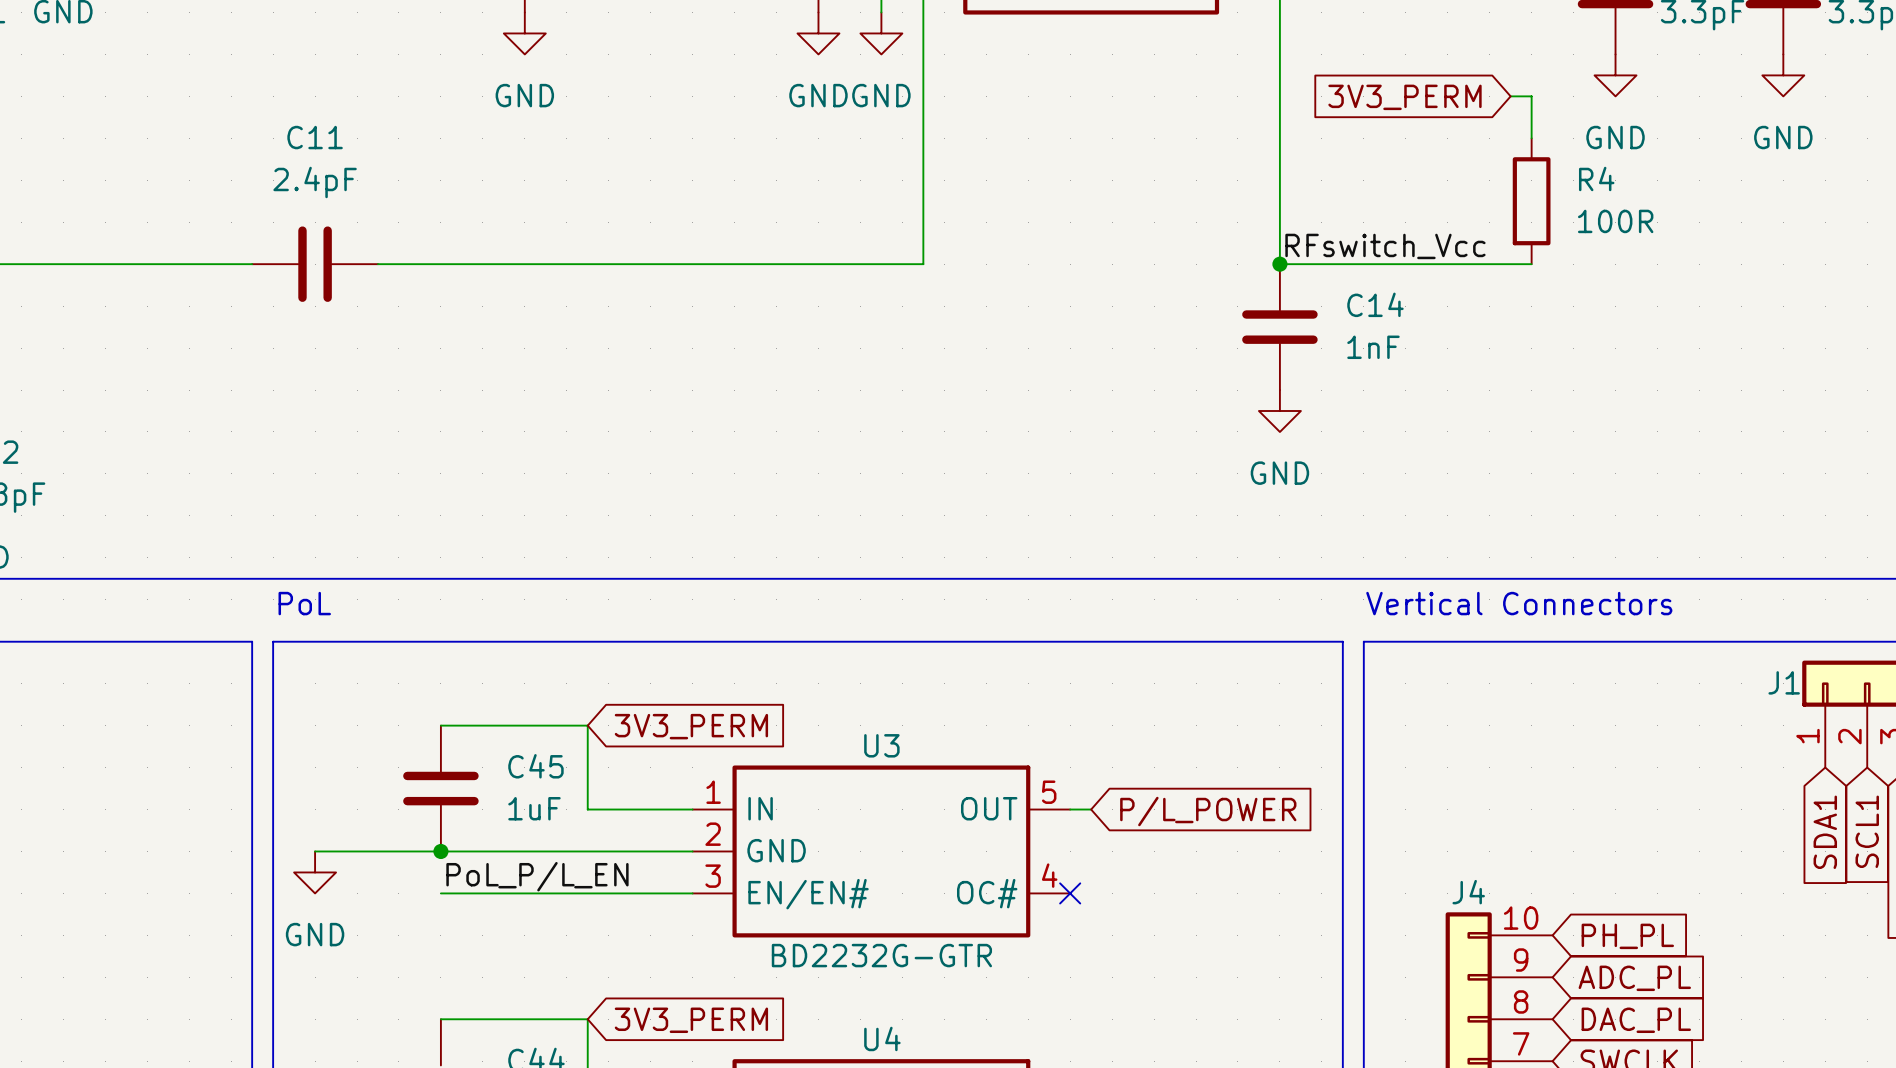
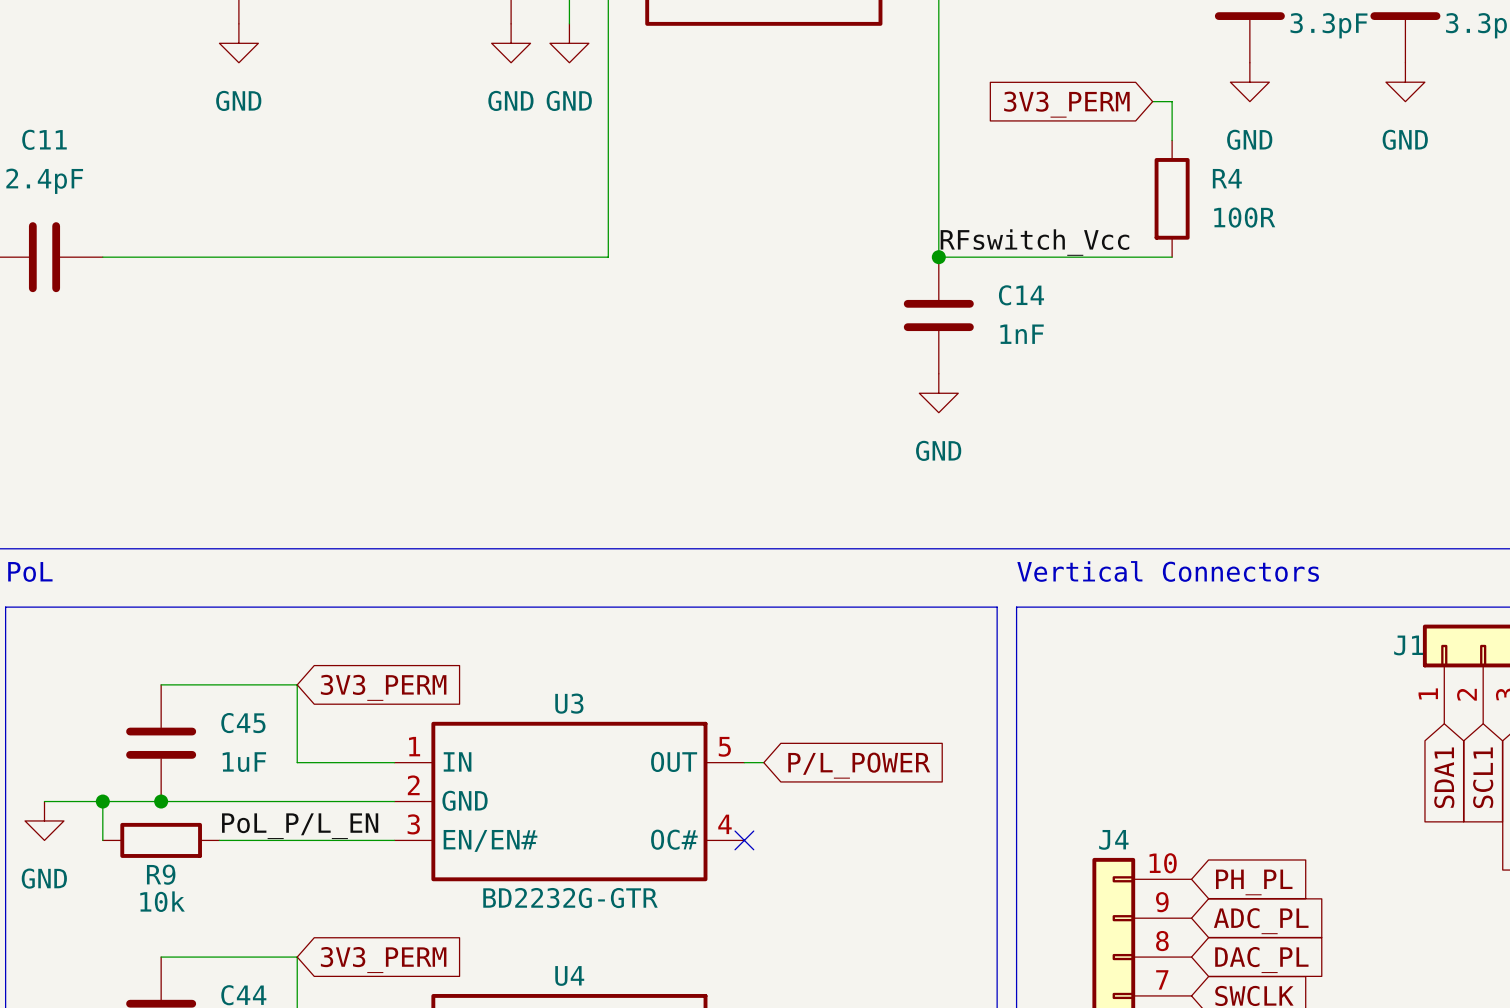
wire: none -> (102, 801) (102, 840)
junction: none -> (102, 801)
label position: PoL_P/L_EN (537, 876) -> PoL_P/L_EN (300, 826)
wire: (440, 893) (503, 893) -> none
R9: none -> 10k (161, 840)

